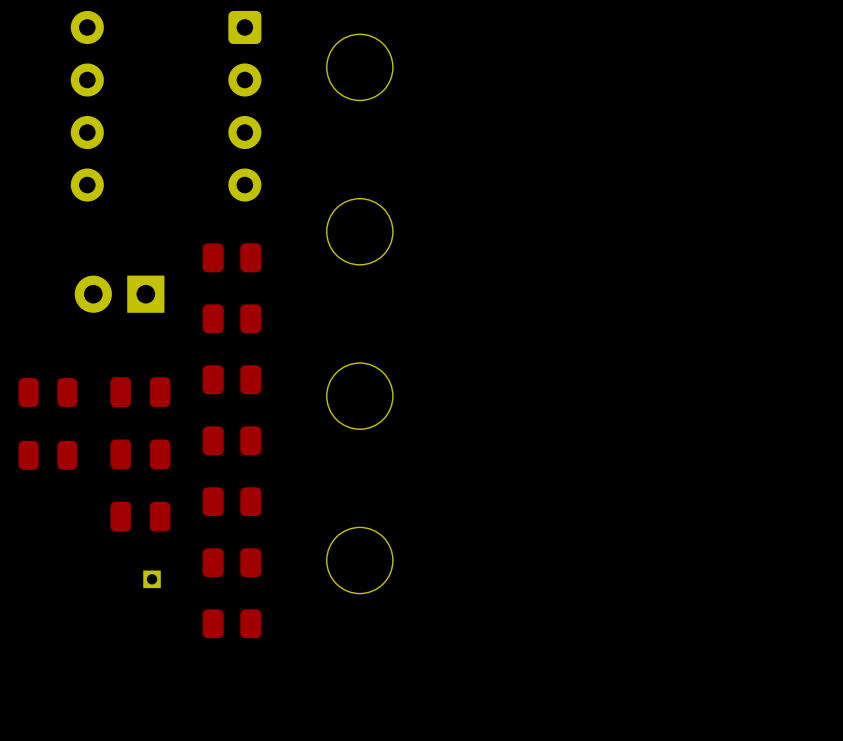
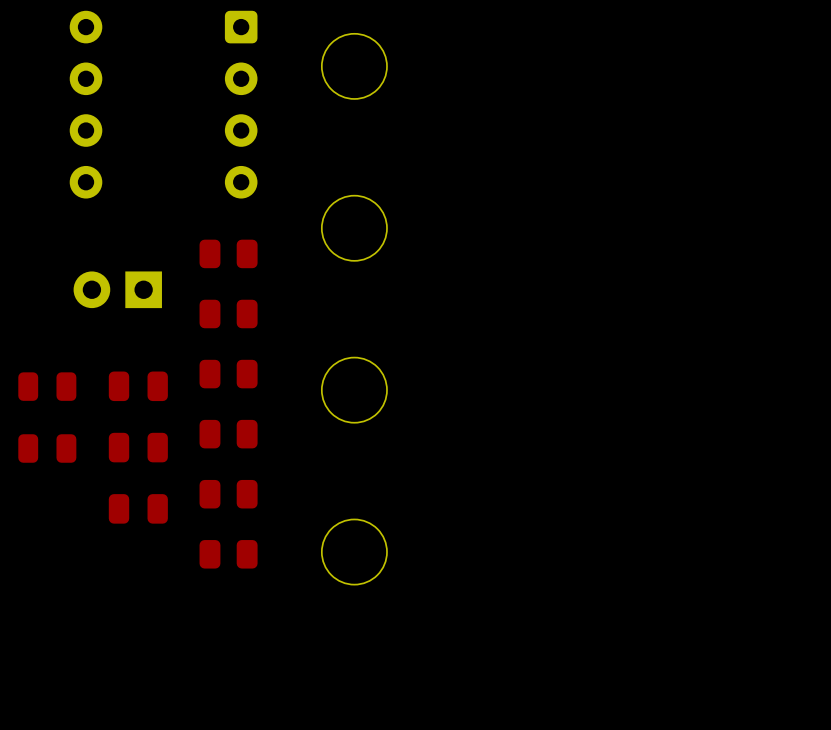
part: (152, 579) -> none
part: (232, 623) -> none

